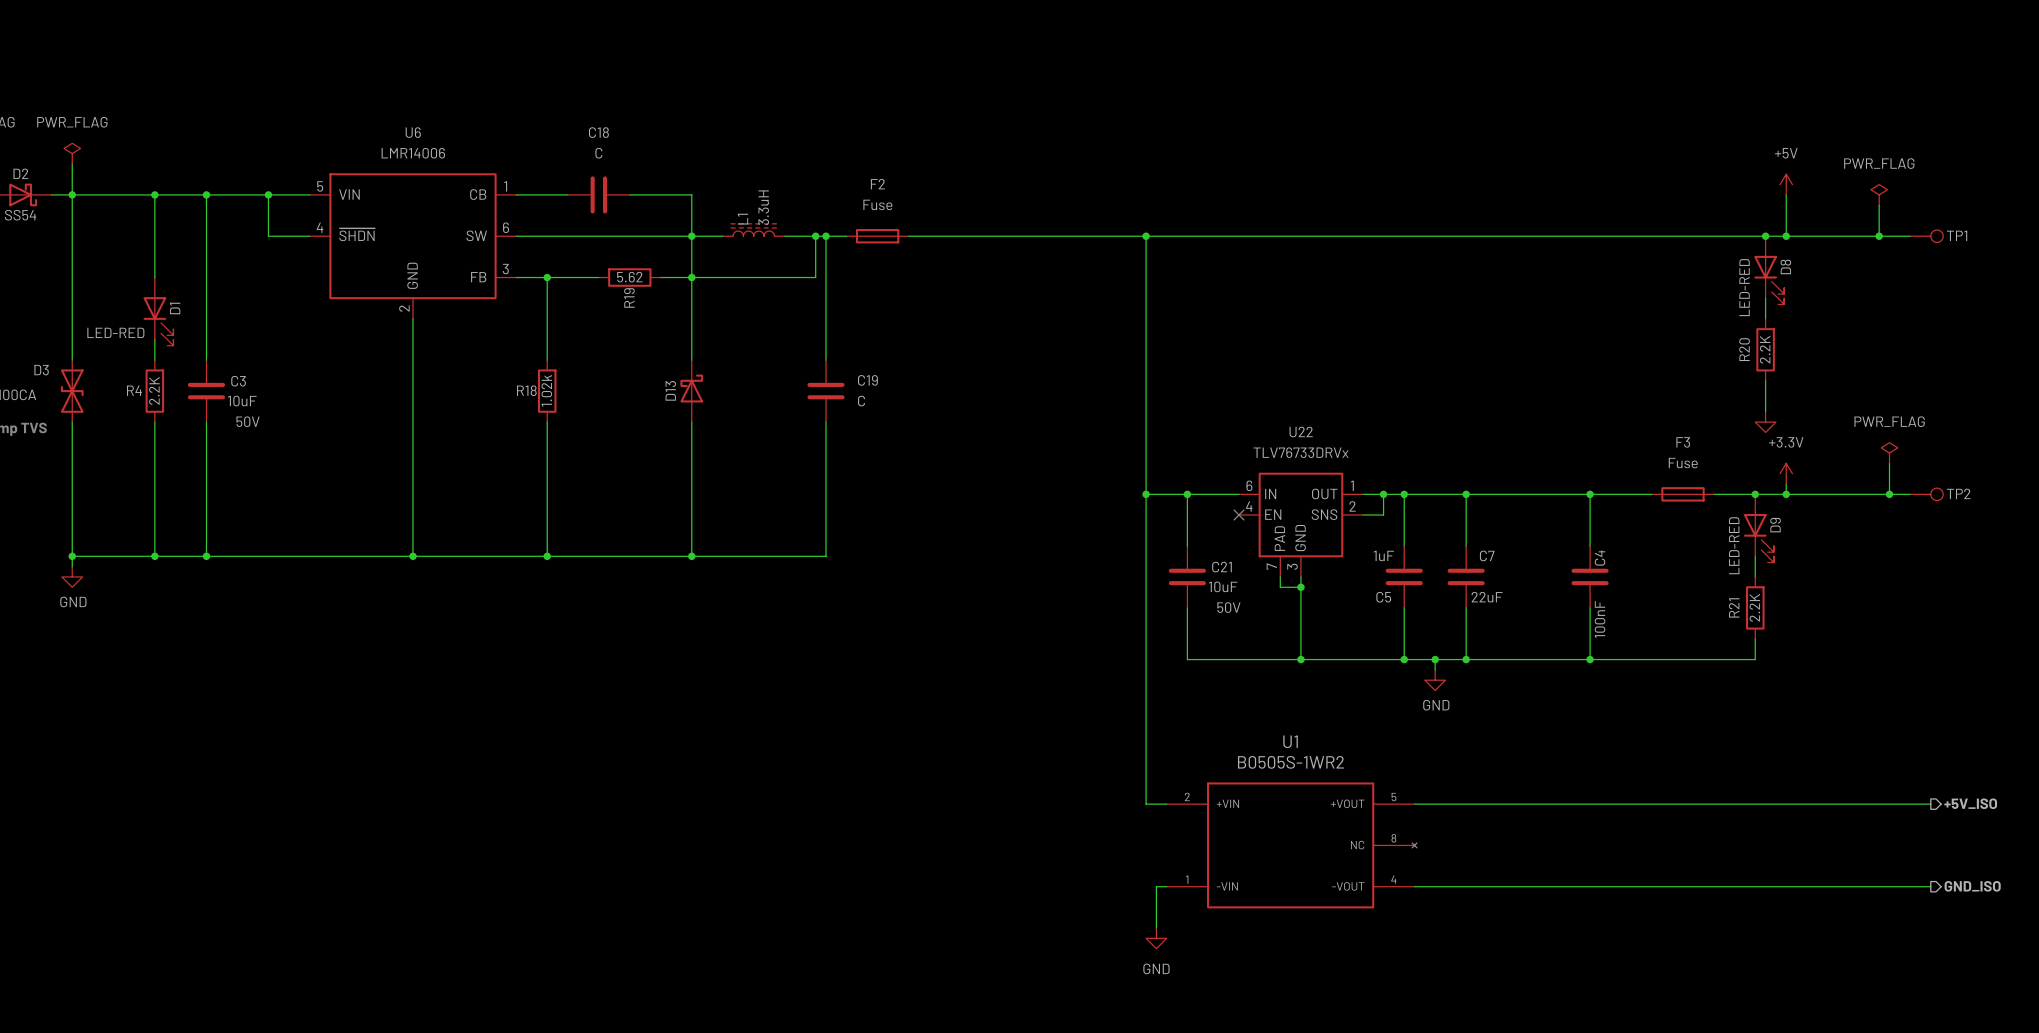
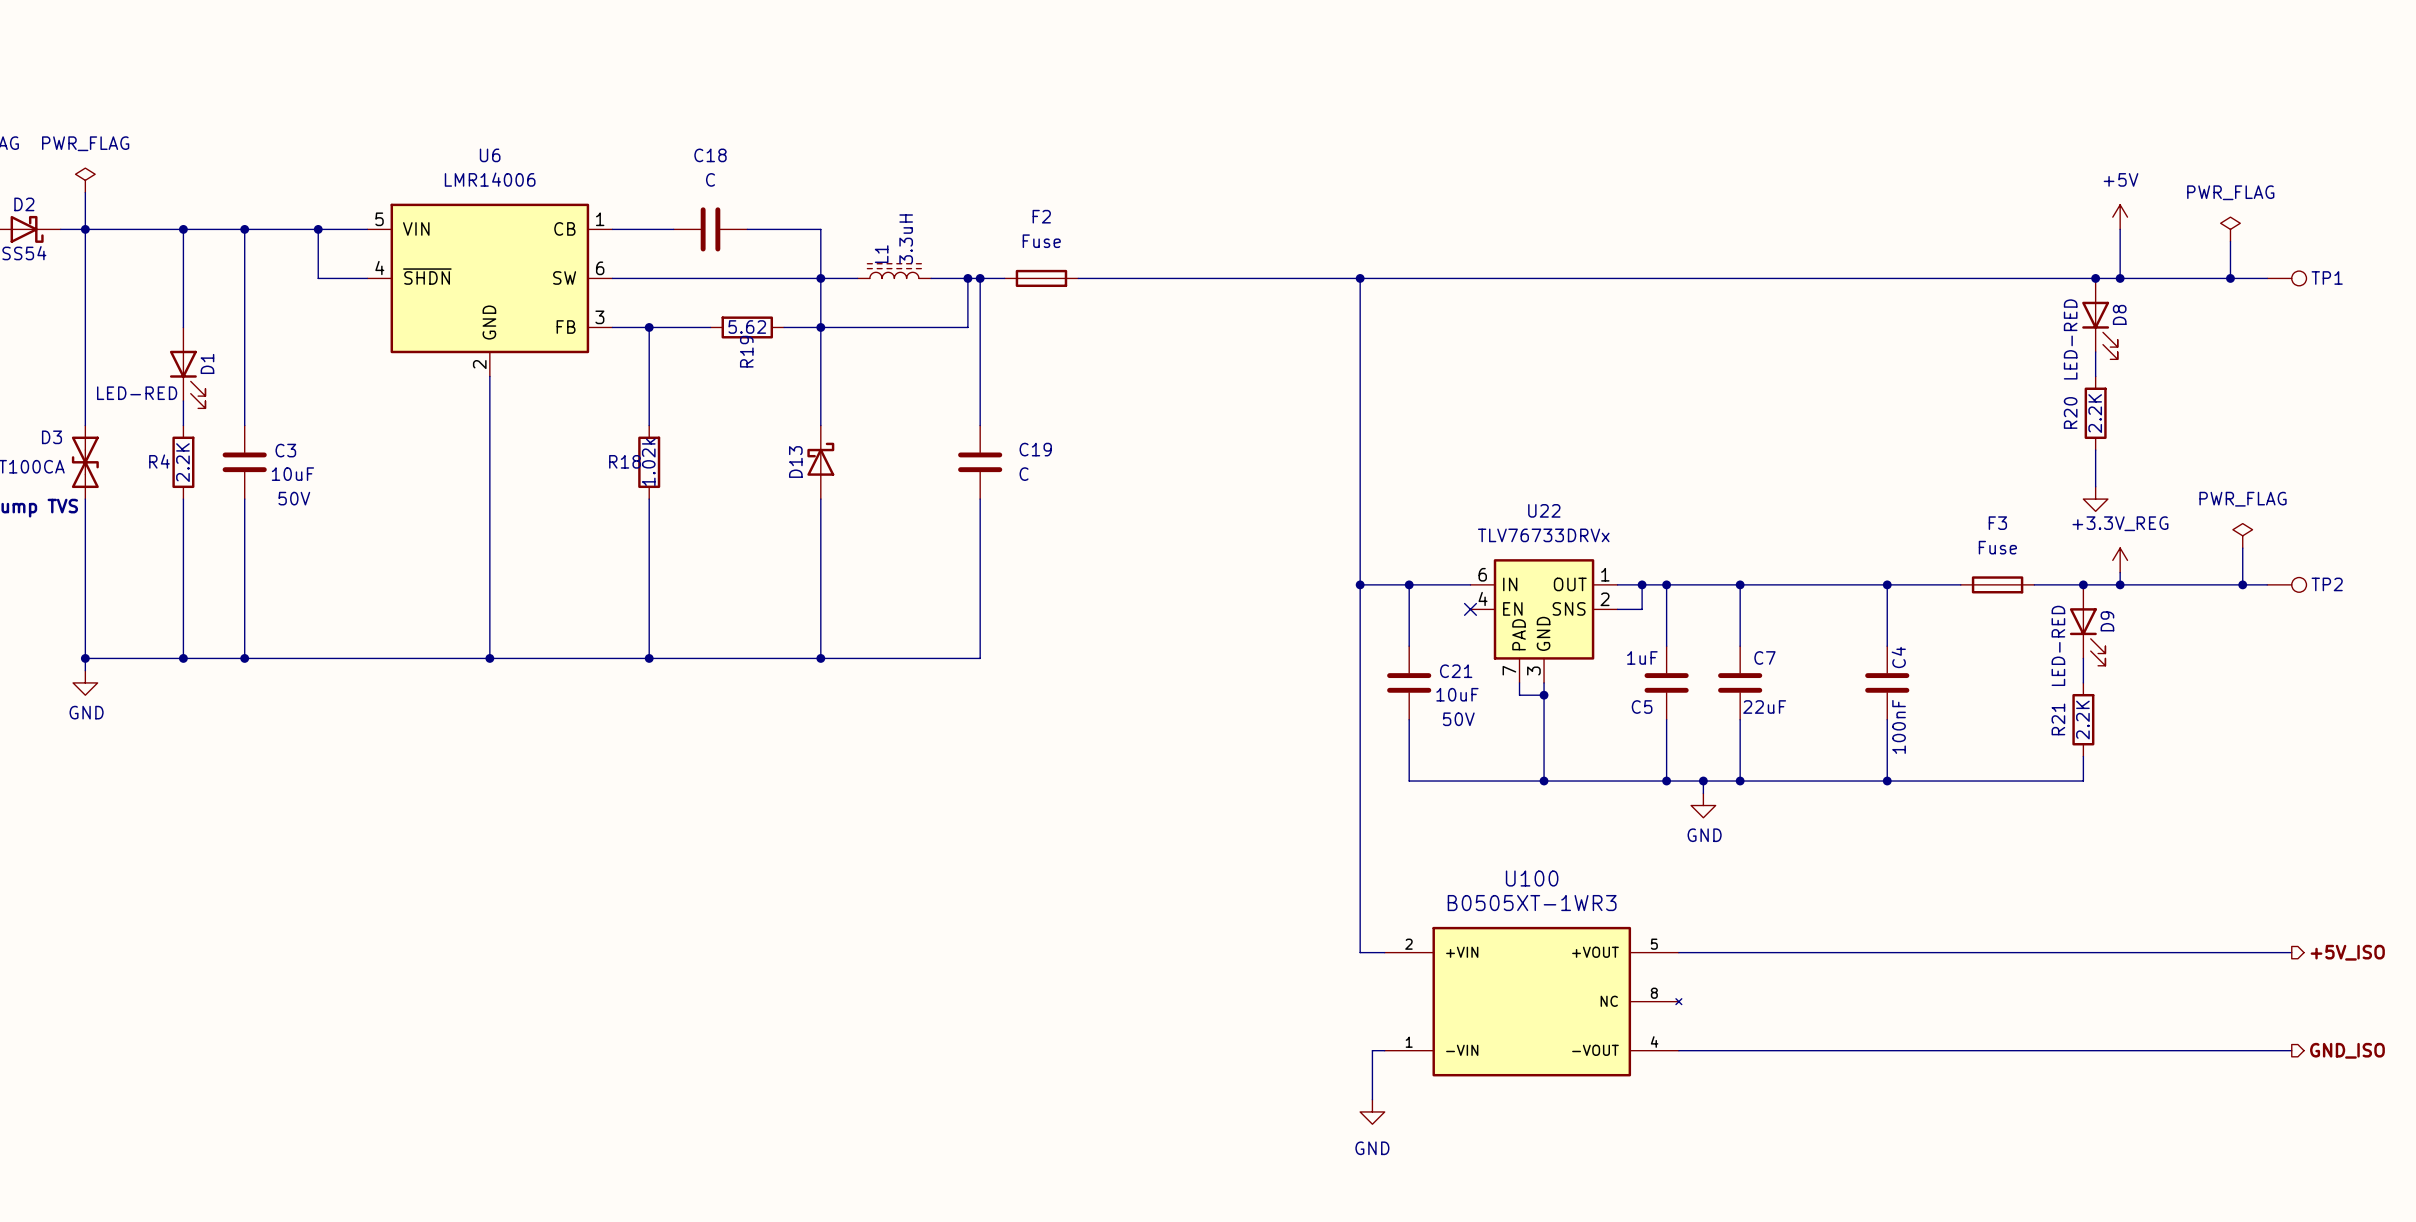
power symbol: +3.3V (1786, 473) -> +3.3V_REG (2120, 560)
U1 name: U1 (1290, 741) -> U100 (1532, 878)
U1 value: B0505S-1WR2 (1290, 762) -> B0505XT-1WR3 (1532, 903)

